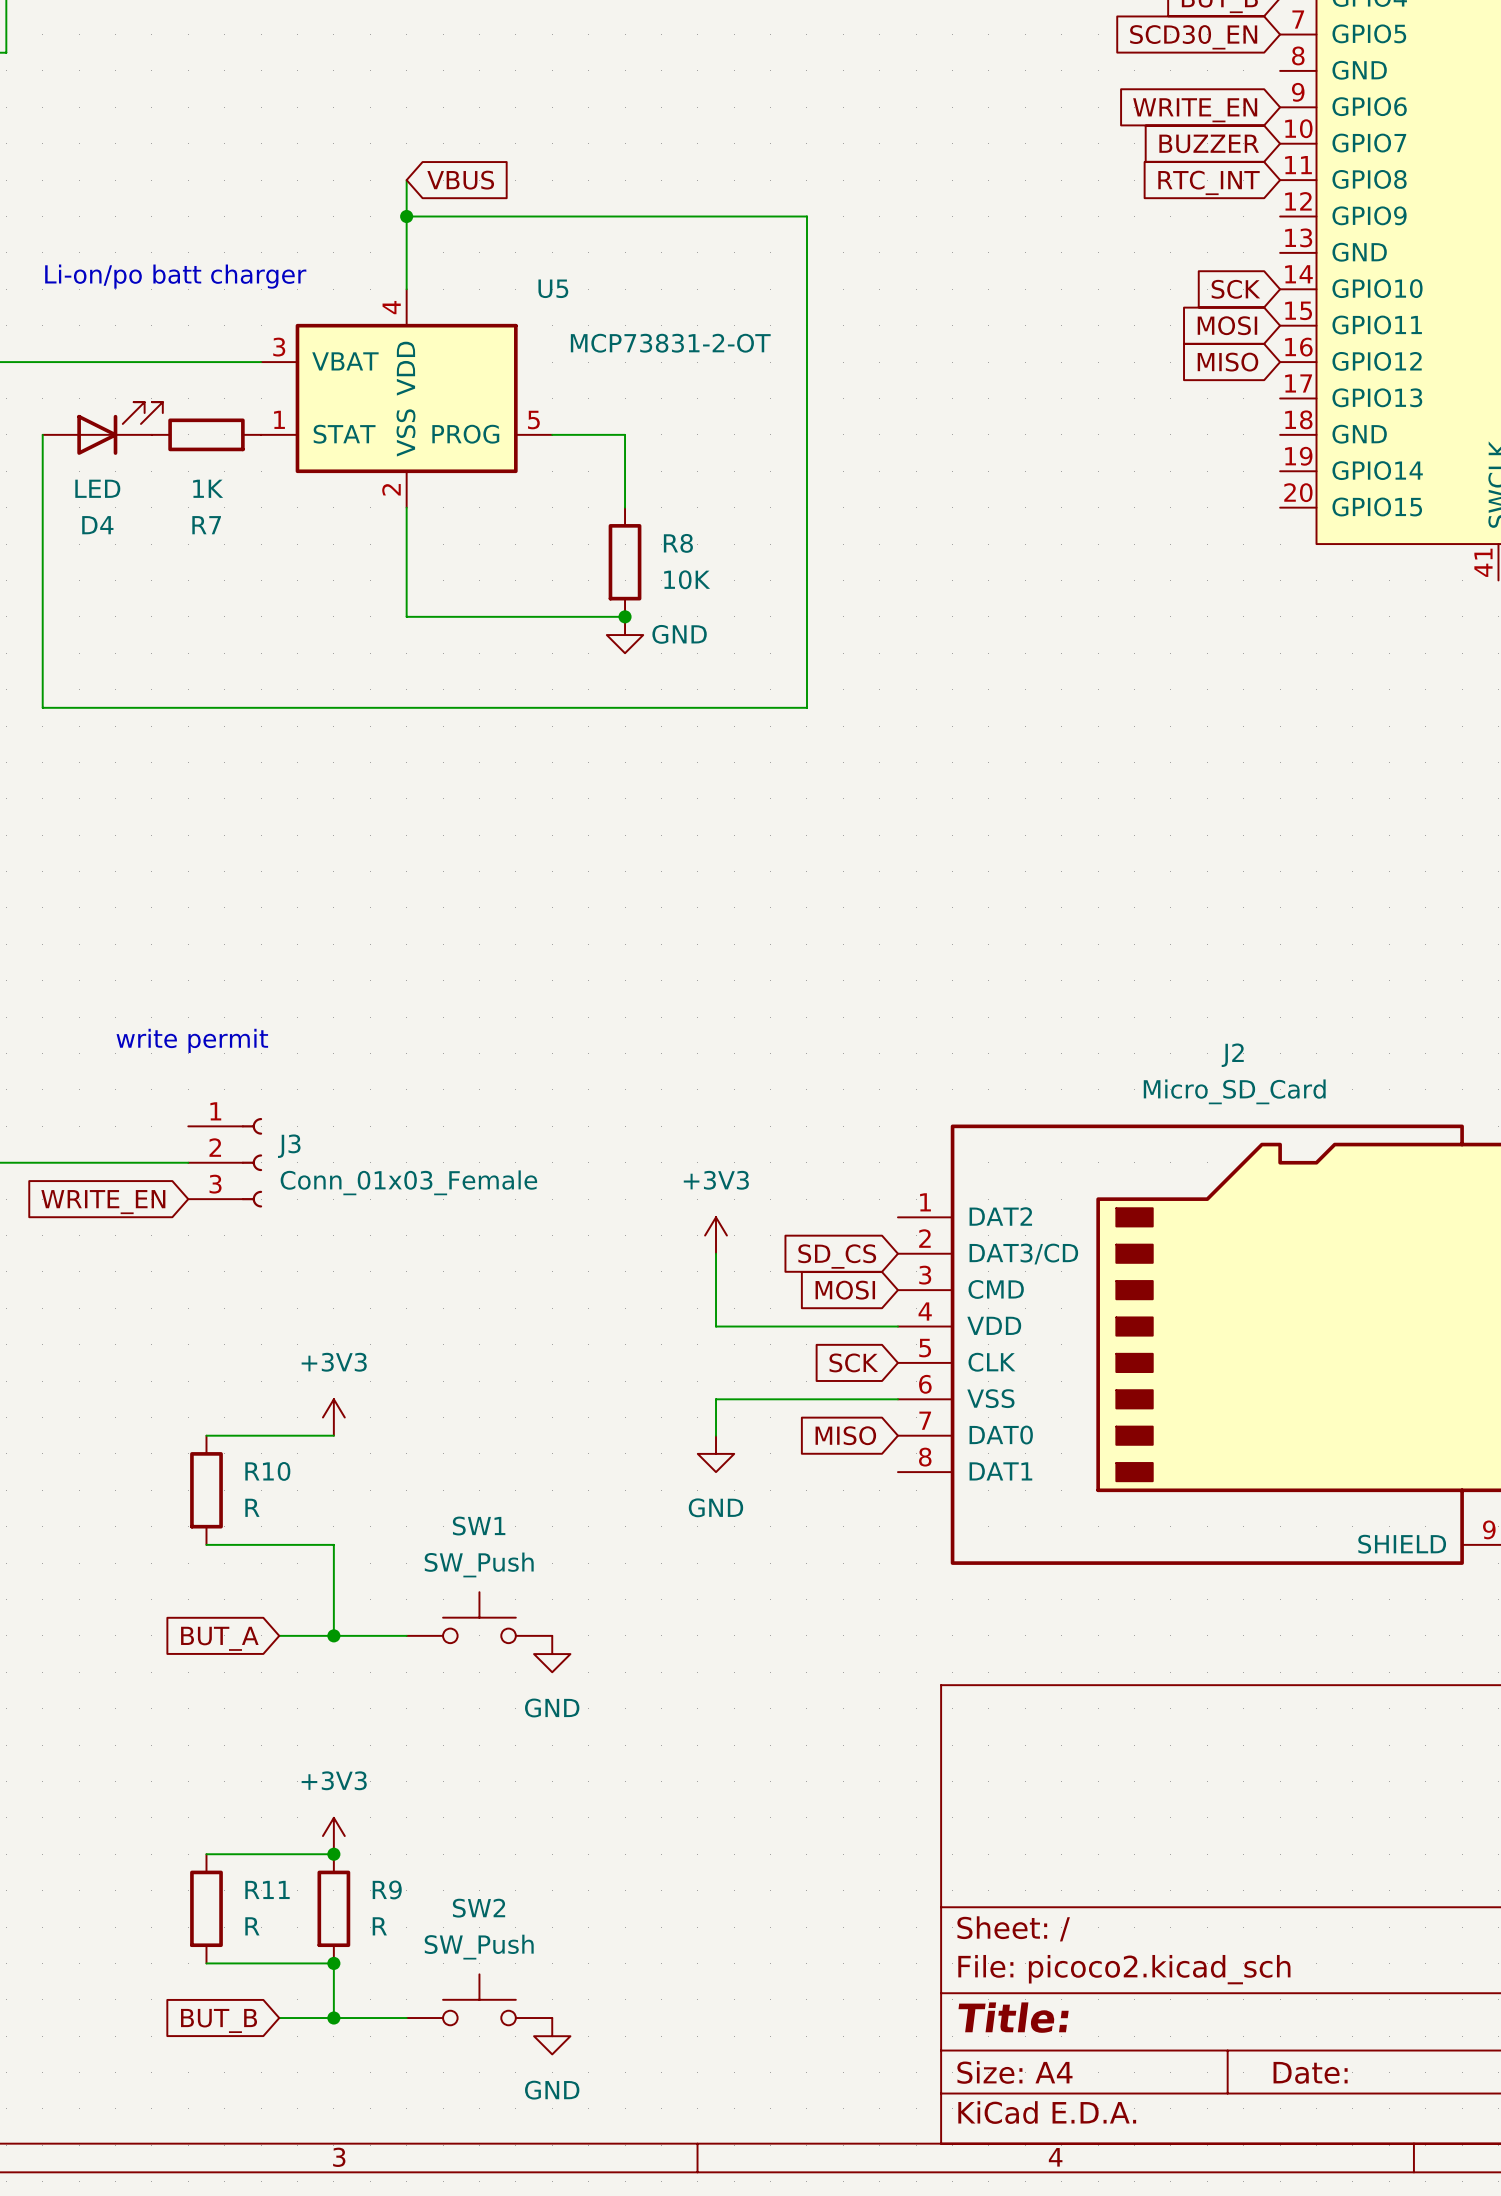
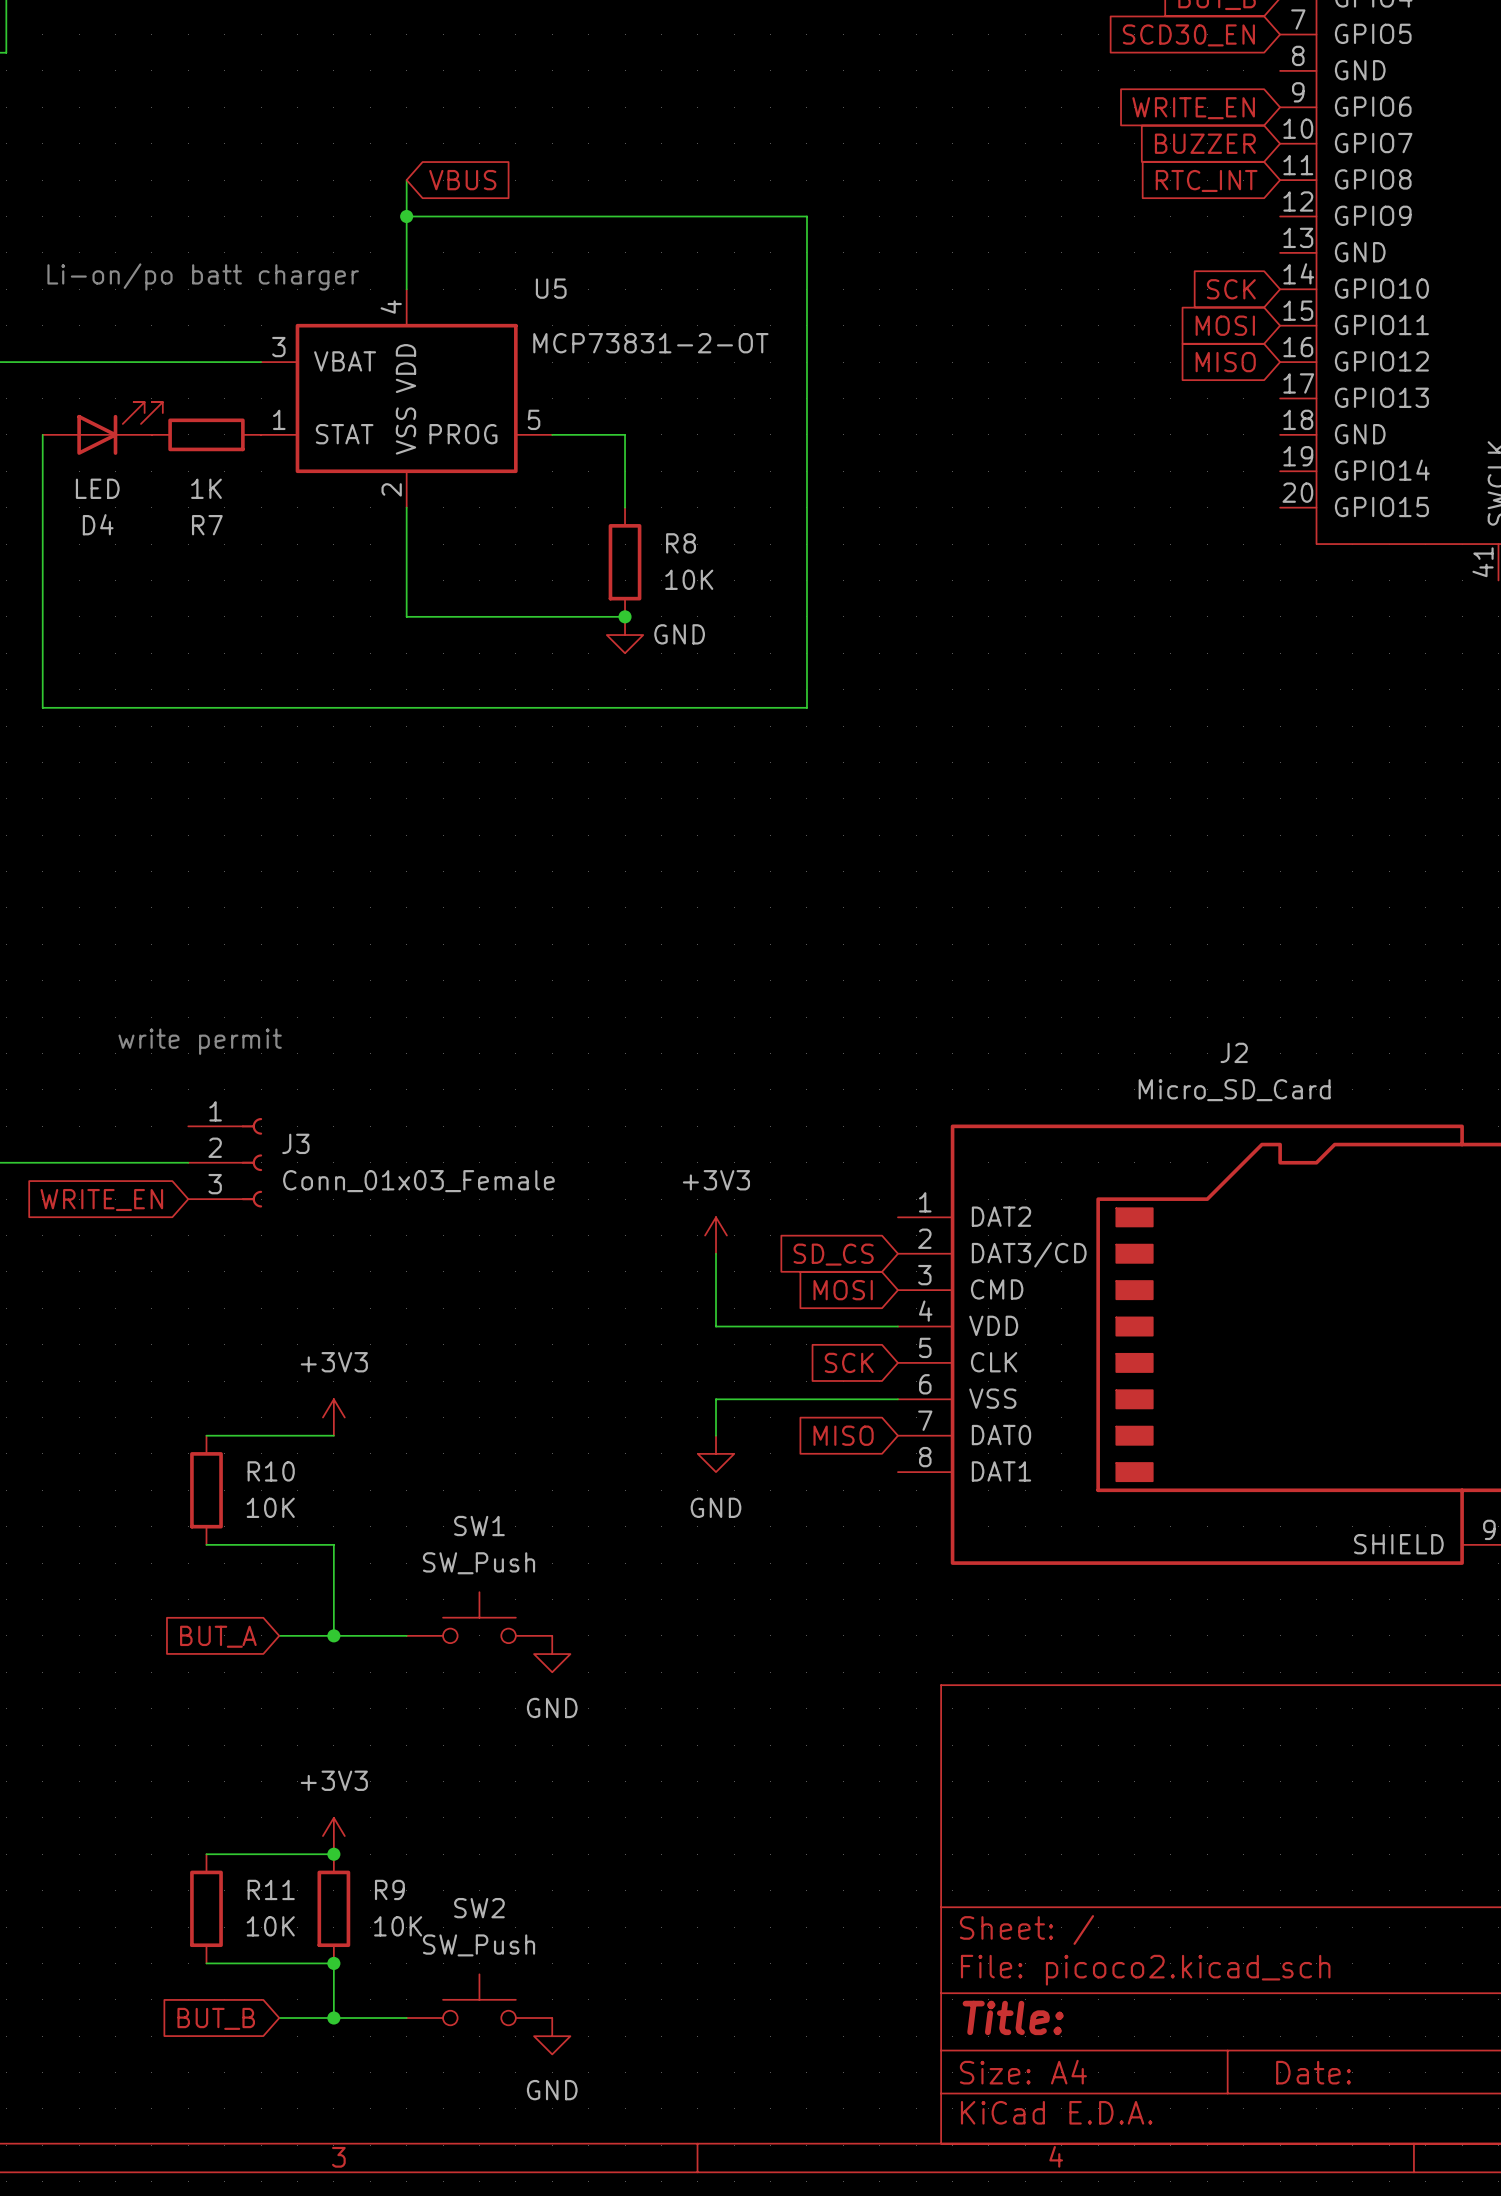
R10 value: R (252, 1507) -> 10K (270, 1507)
R11 value: R (252, 1926) -> 10K (270, 1926)
R9 value: R (379, 1926) -> 10K (398, 1926)

